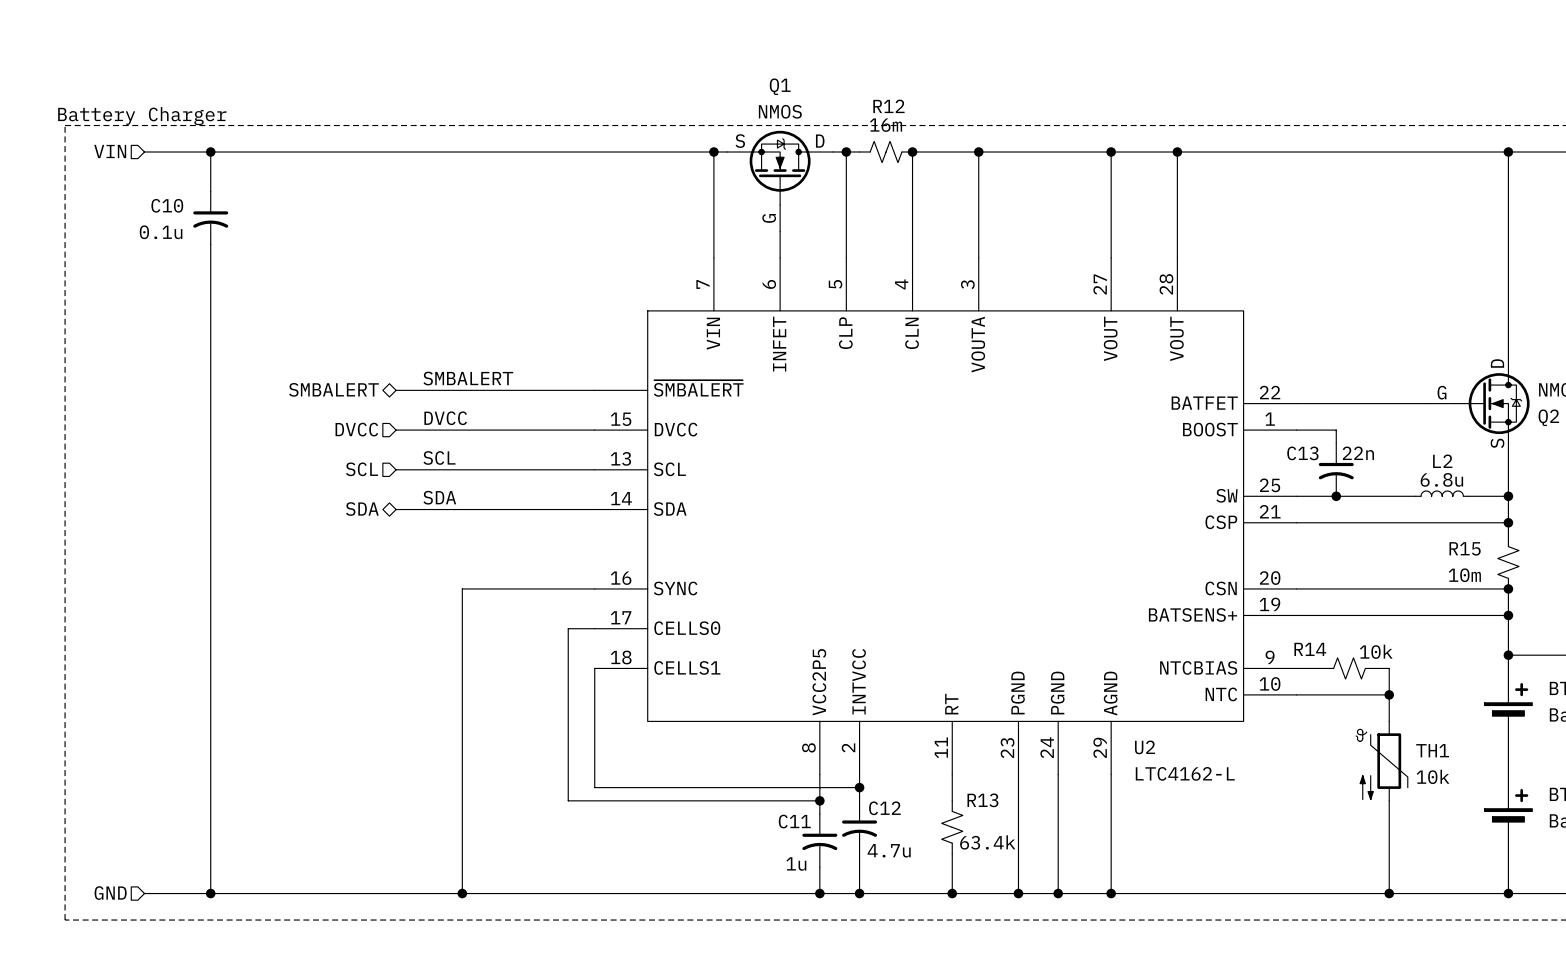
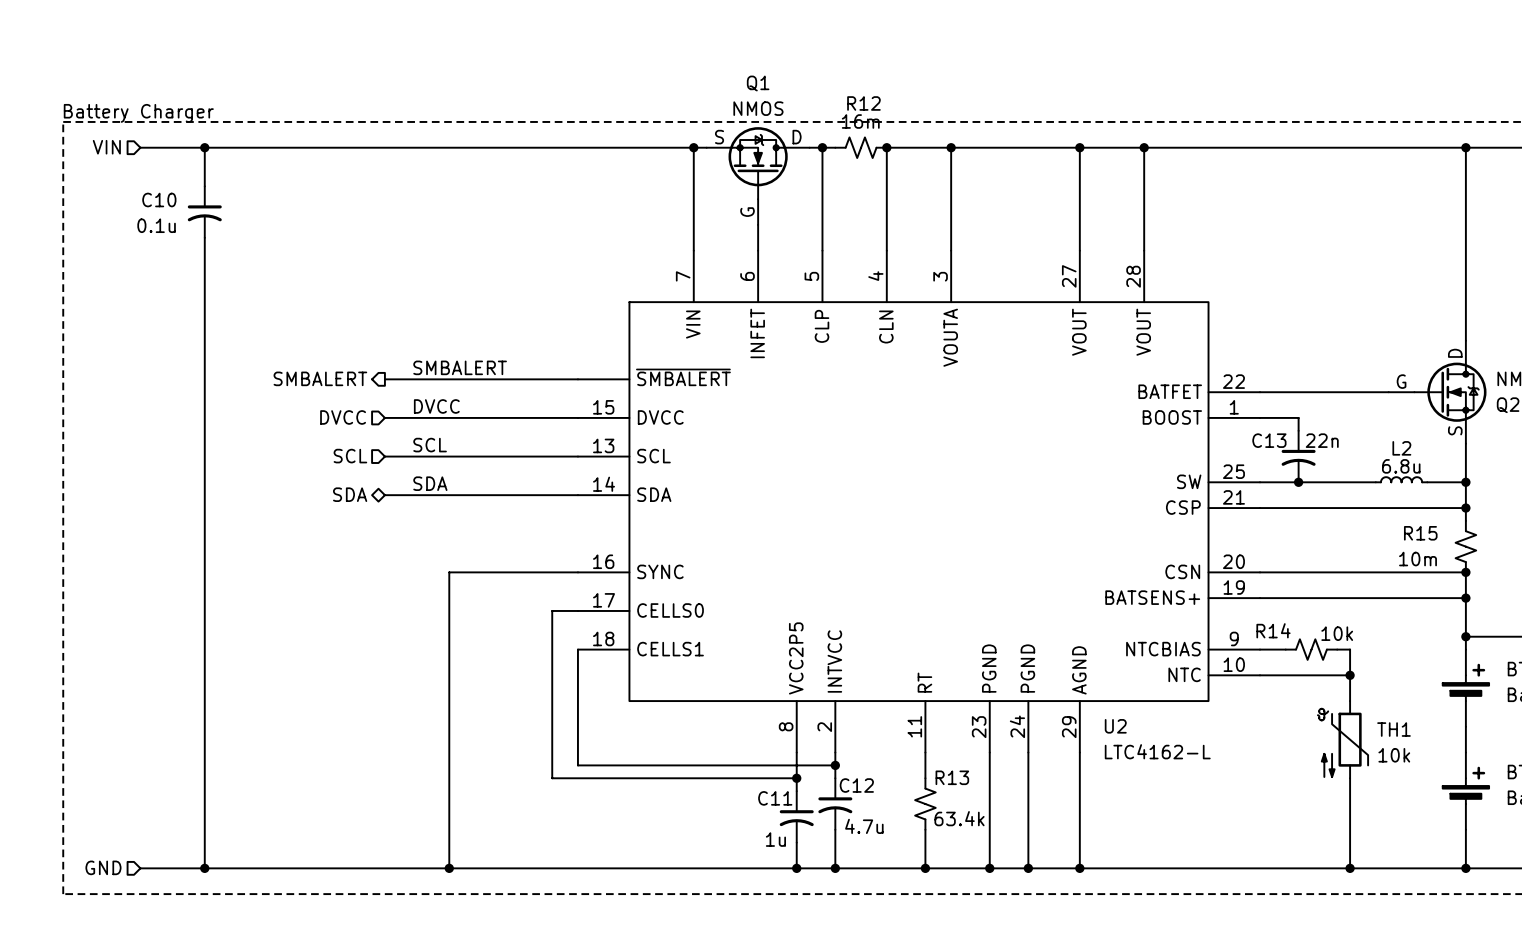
hierarchical label shape: bidirectional (333, 389) -> output (320, 378)

